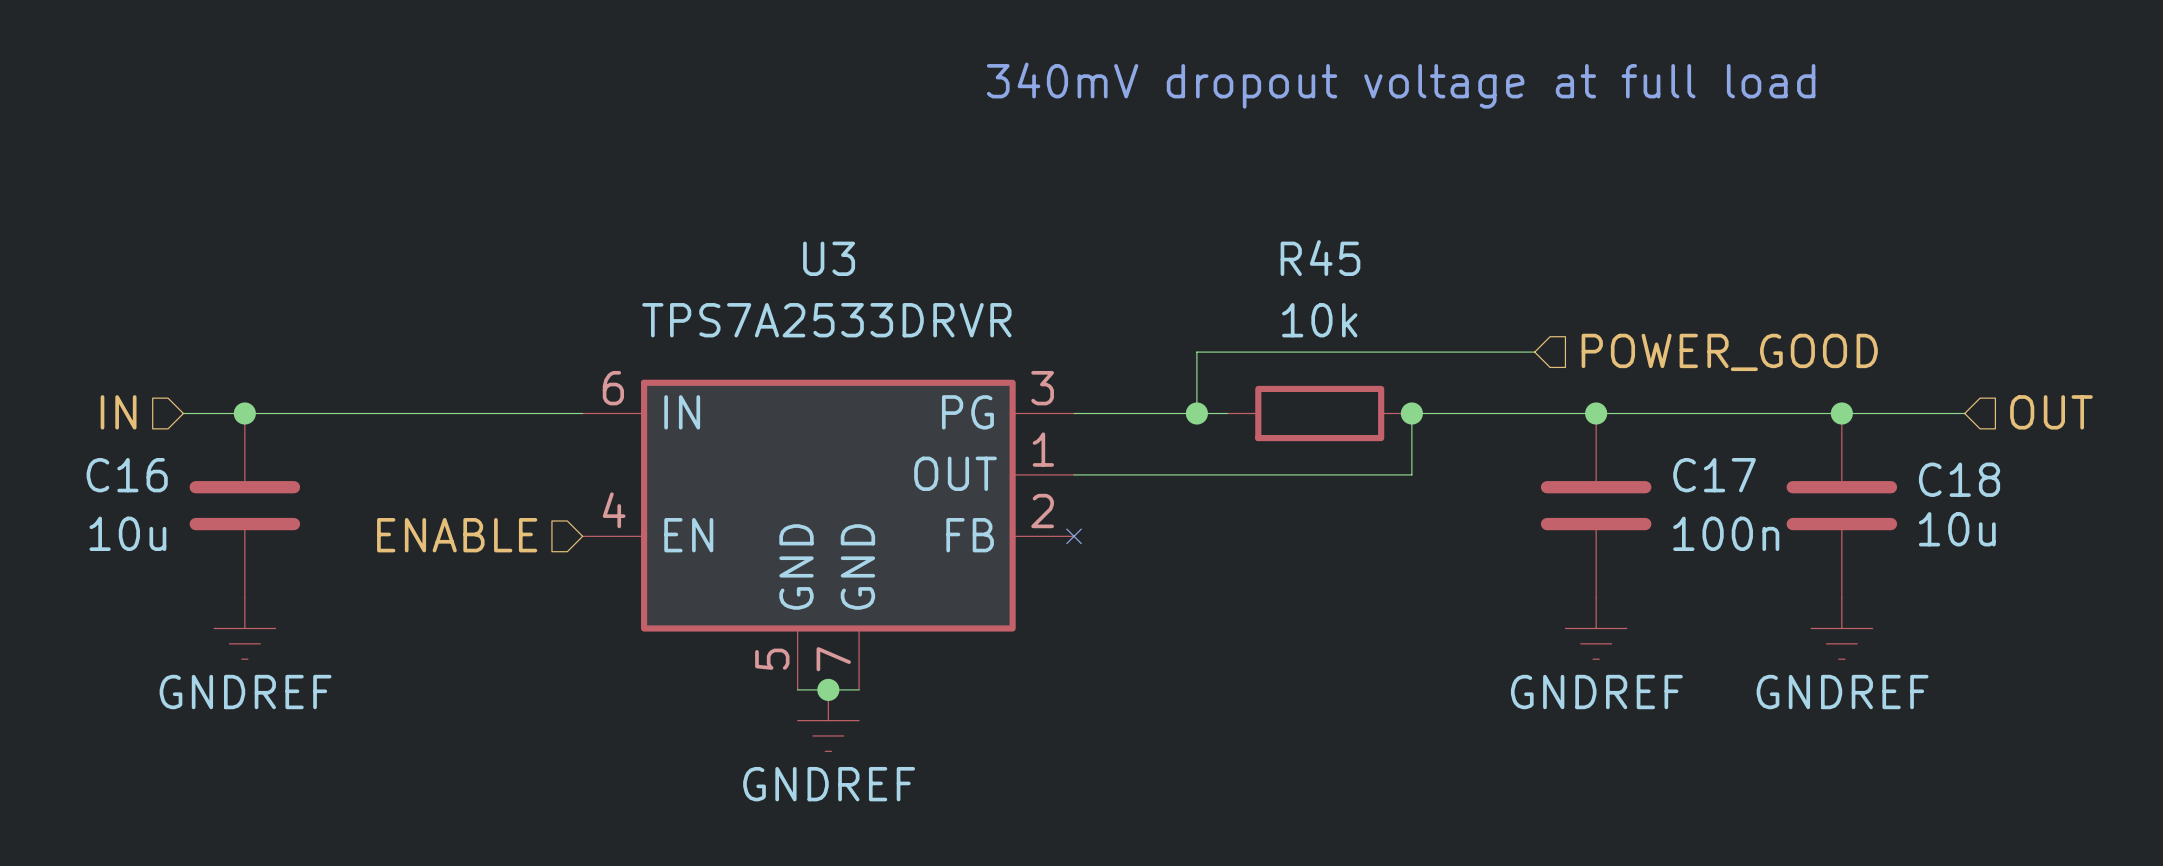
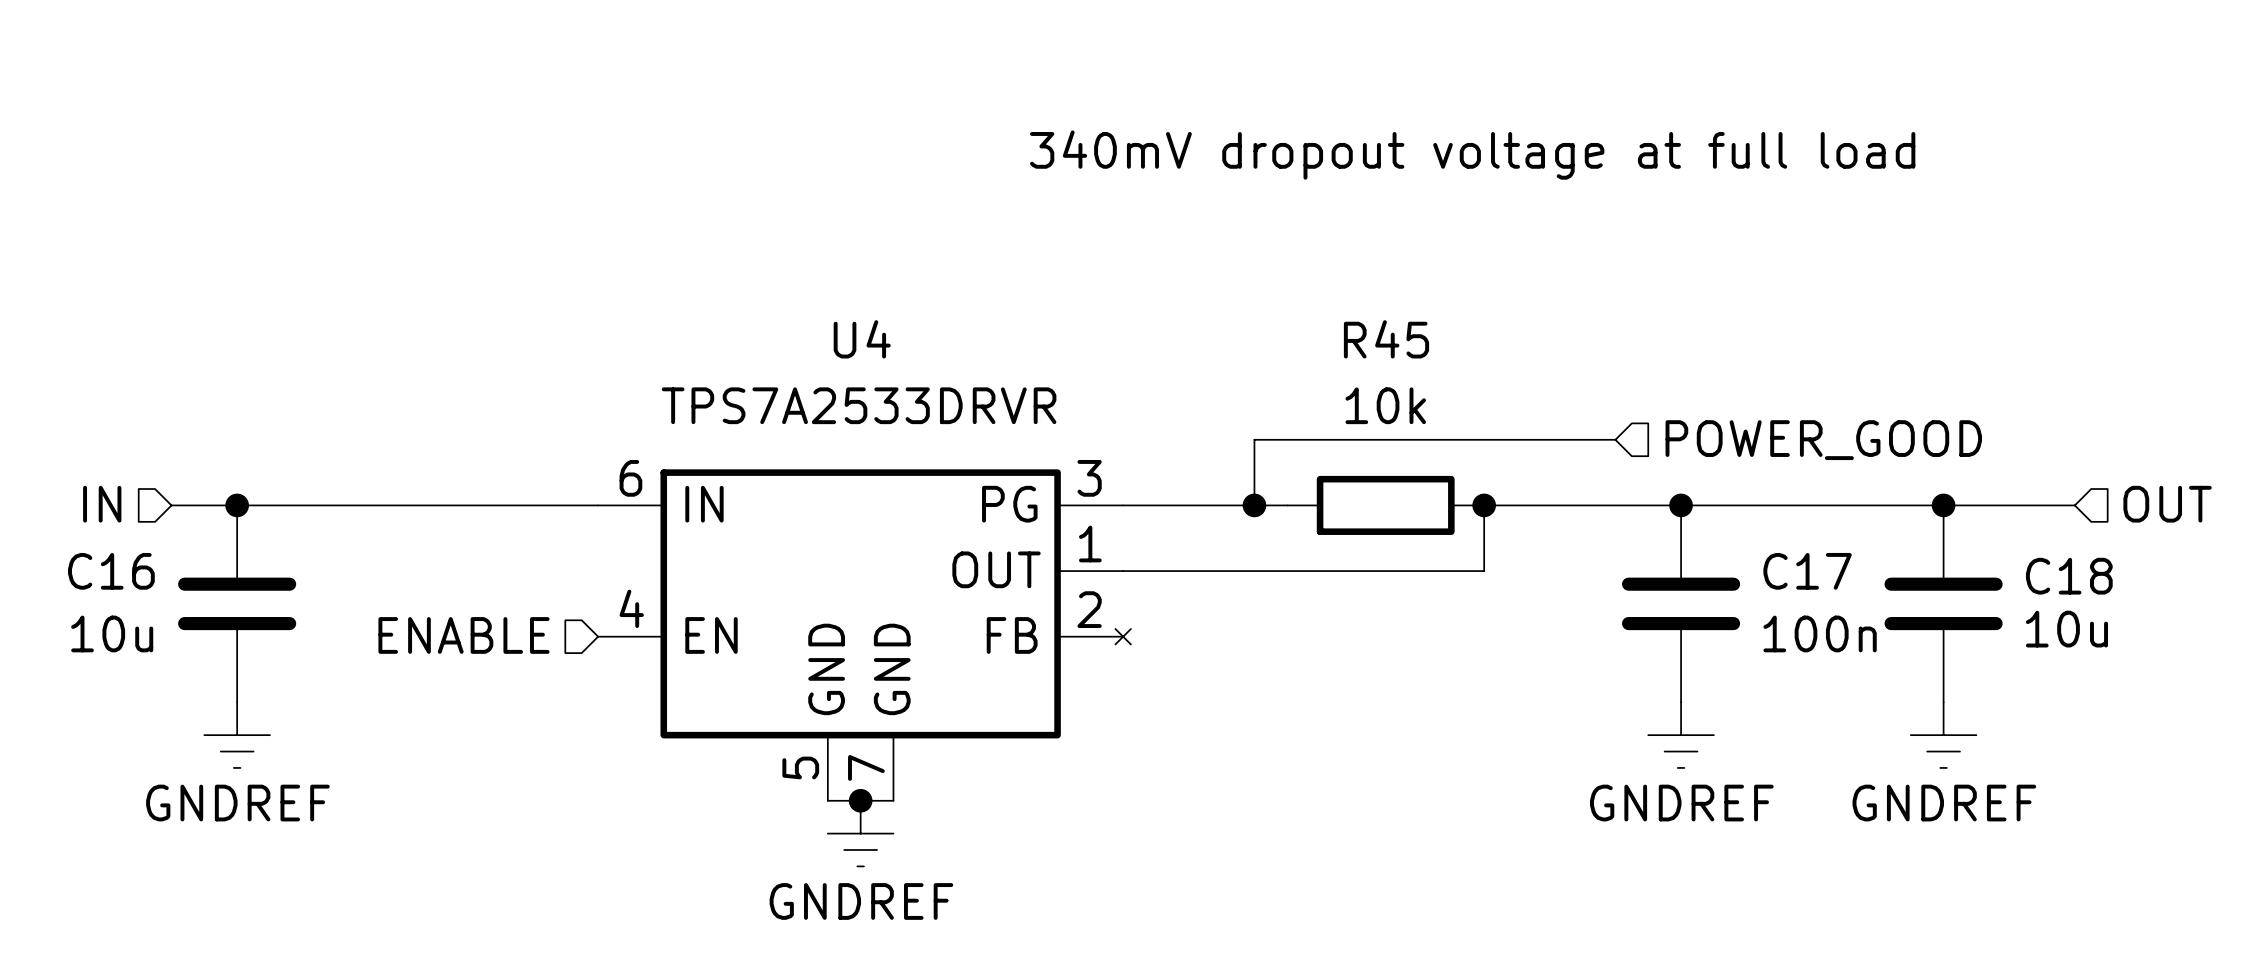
U3 name: U3 (829, 258) -> U4 (862, 339)

